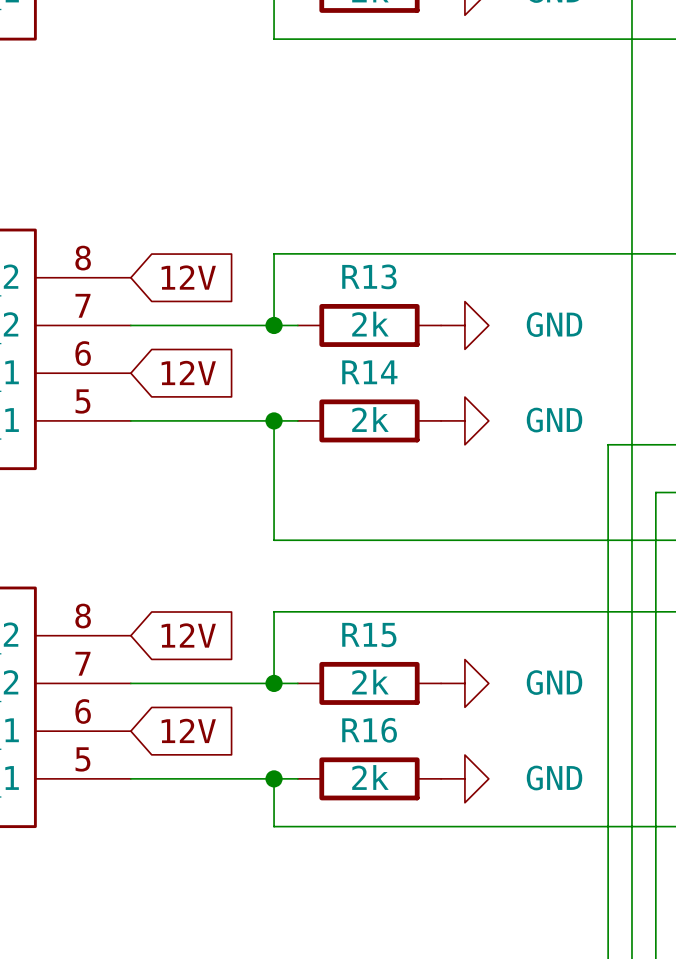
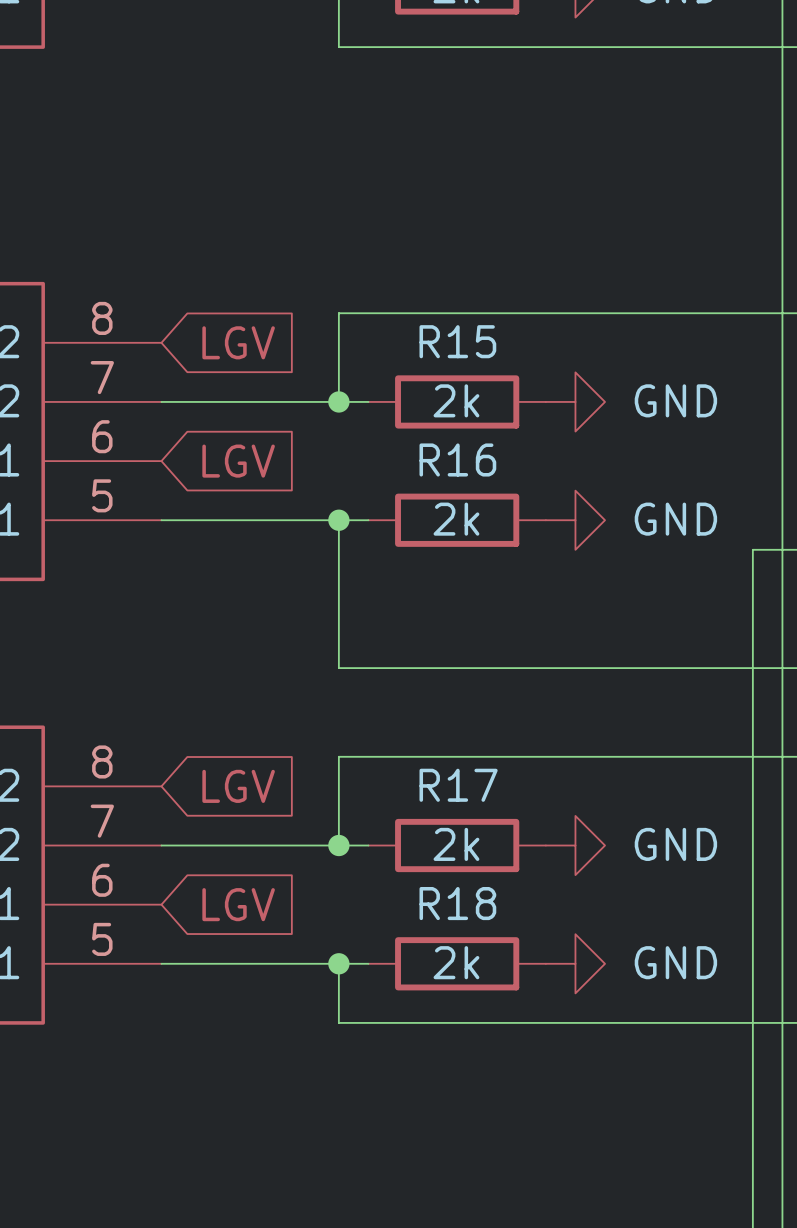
R13 name: R13 (369, 276) -> R15 (457, 341)
global label: 12V (188, 277) -> LGV (238, 342)
global label: 12V (188, 372) -> LGV (238, 461)
R14 name: R14 (369, 372) -> R16 (457, 459)
global label: 12V (188, 635) -> LGV (238, 786)
R15 name: R15 (369, 635) -> R17 (458, 785)
global label: 12V (188, 730) -> LGV (238, 904)
R16 name: R16 (369, 730) -> R18 (457, 903)

